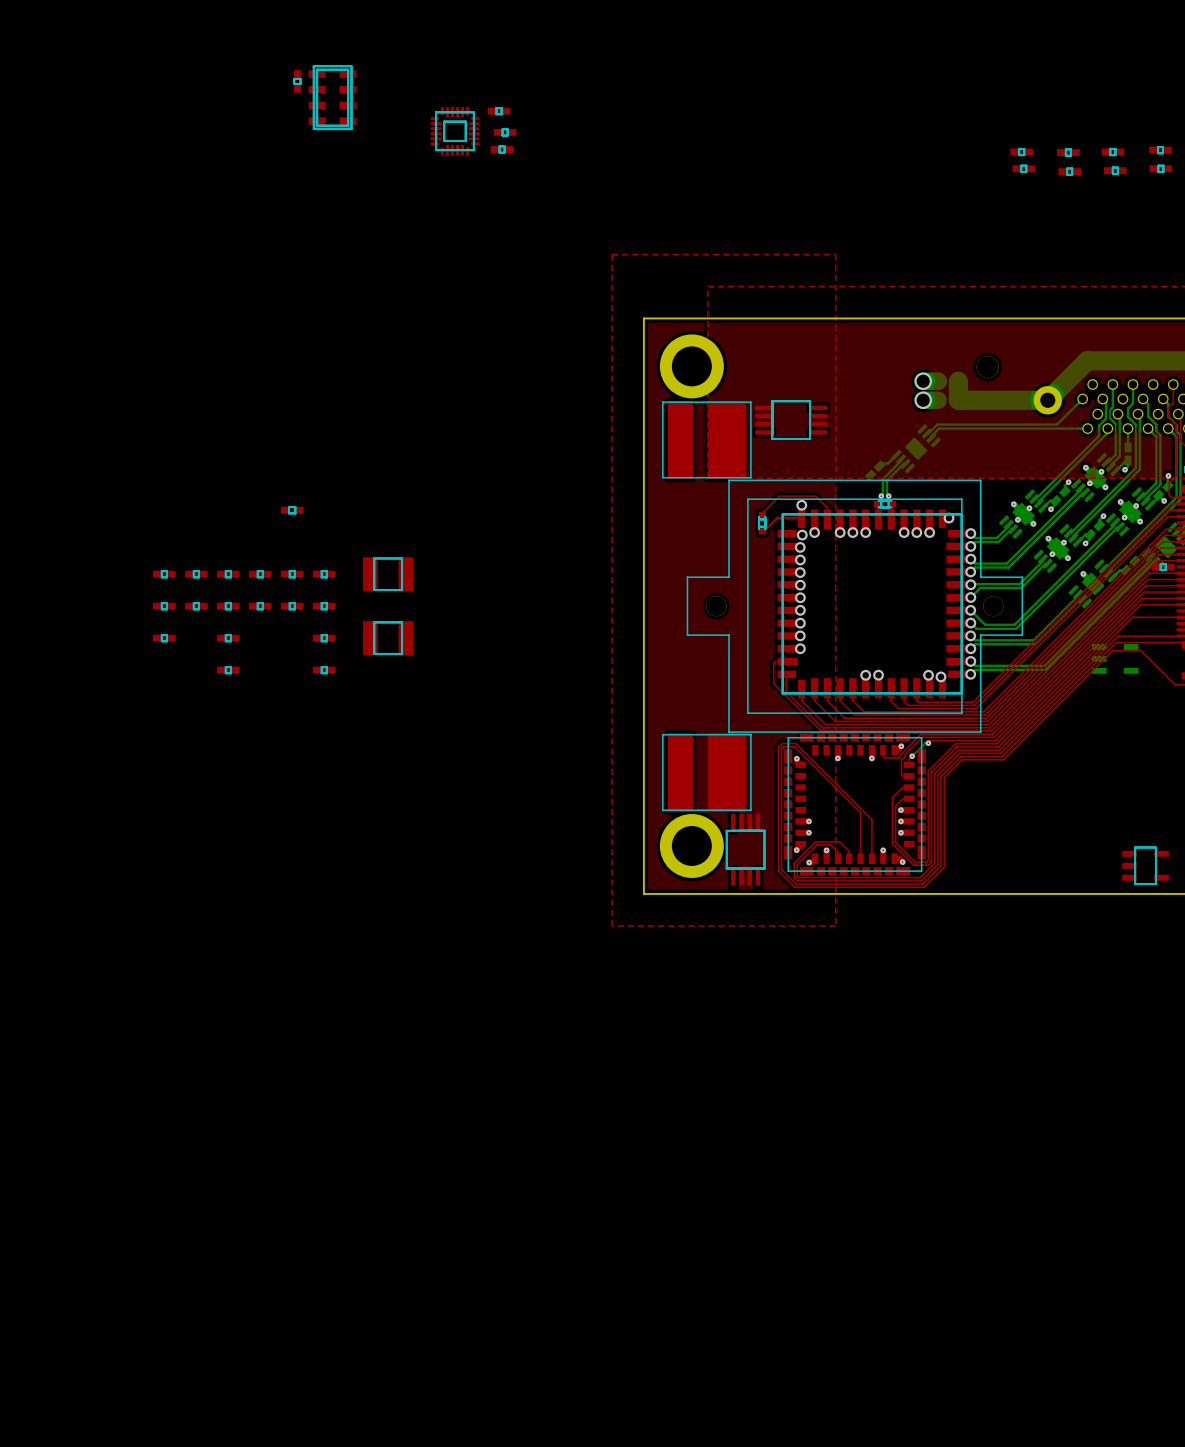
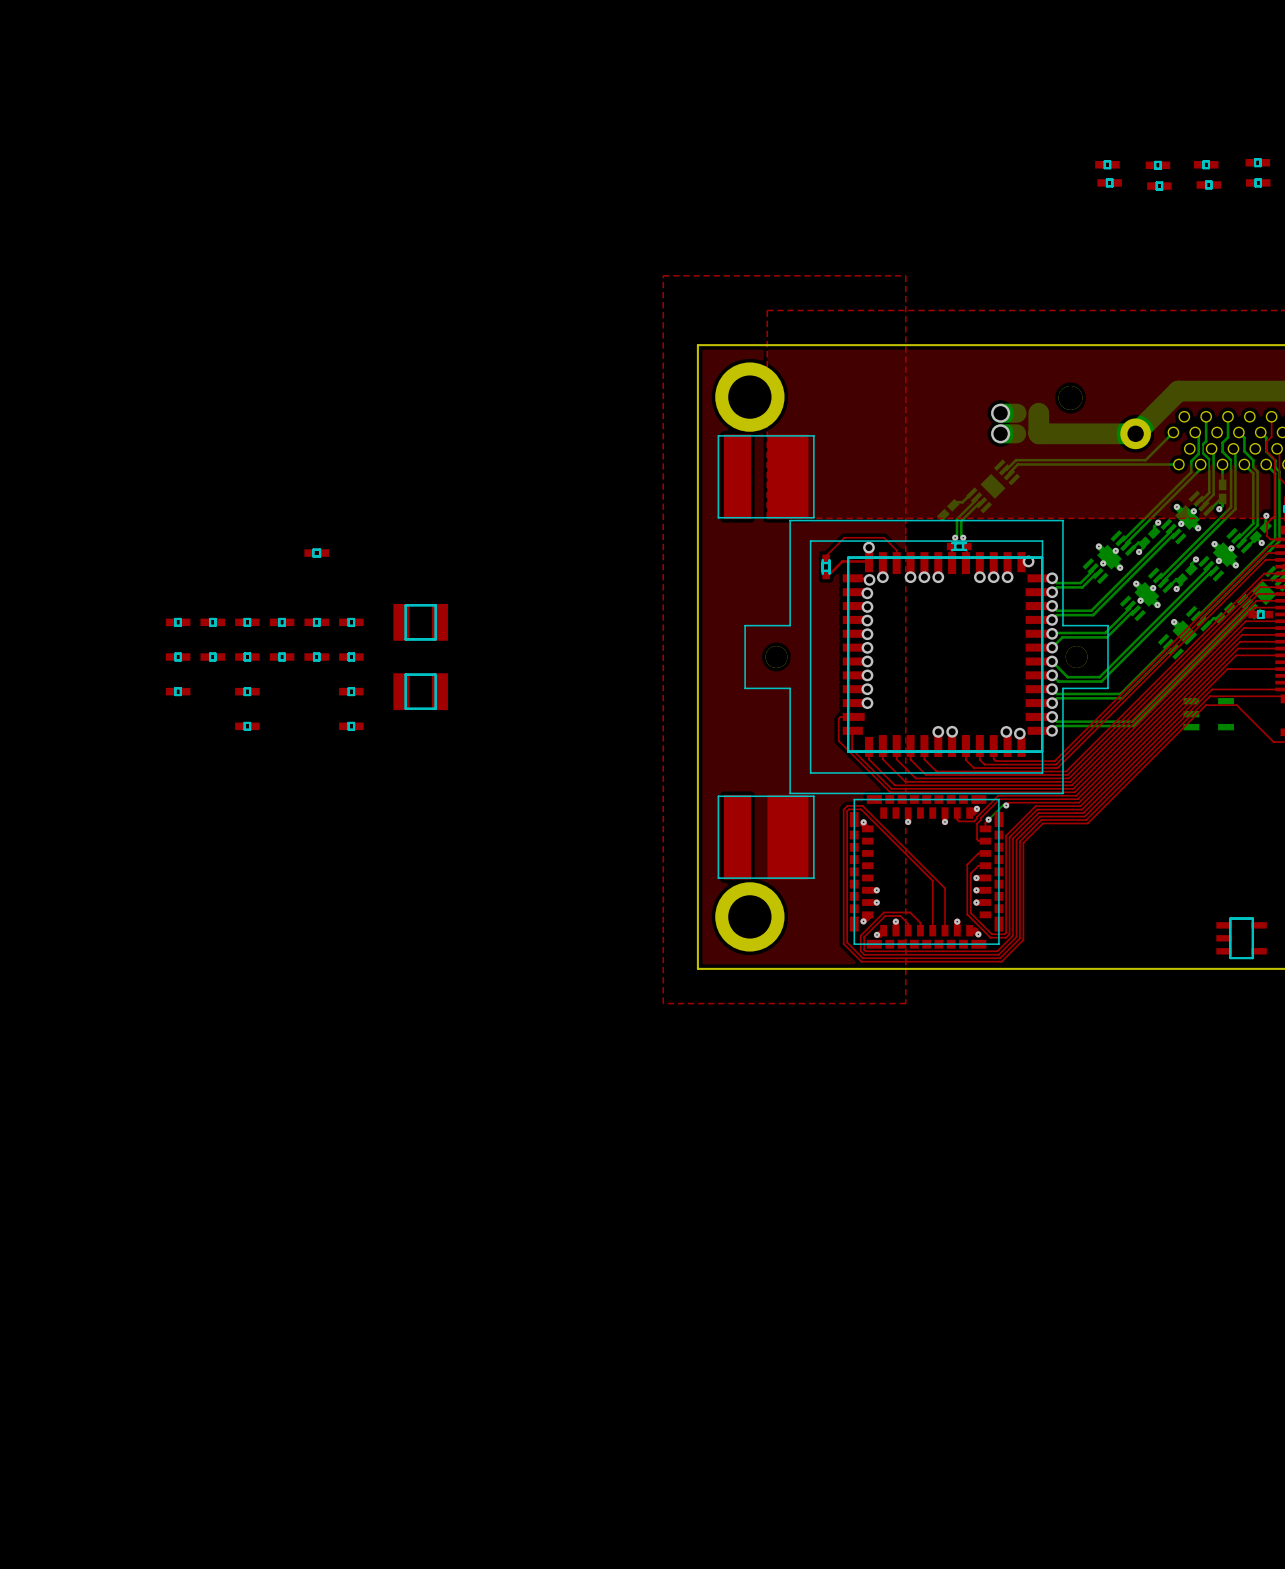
part: (297, 81) -> none
part: (332, 97) -> none
part: (499, 111) -> none
part: (454, 131) -> none
part: (505, 132) -> none
part: (502, 149) -> none
part: (791, 420) -> none
part: (745, 849) -> none

